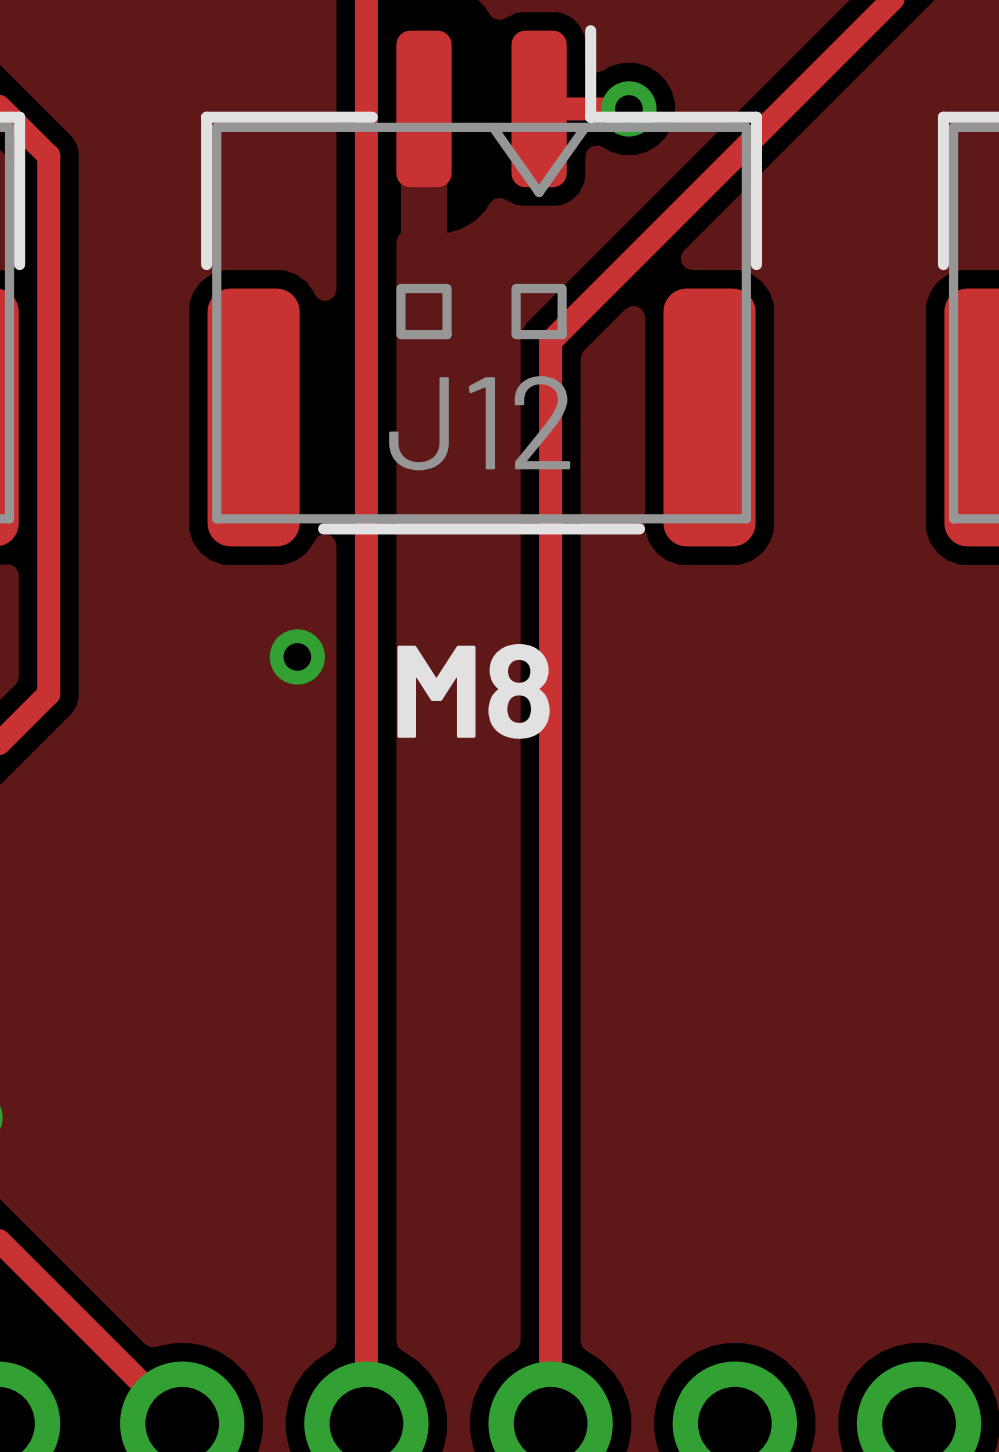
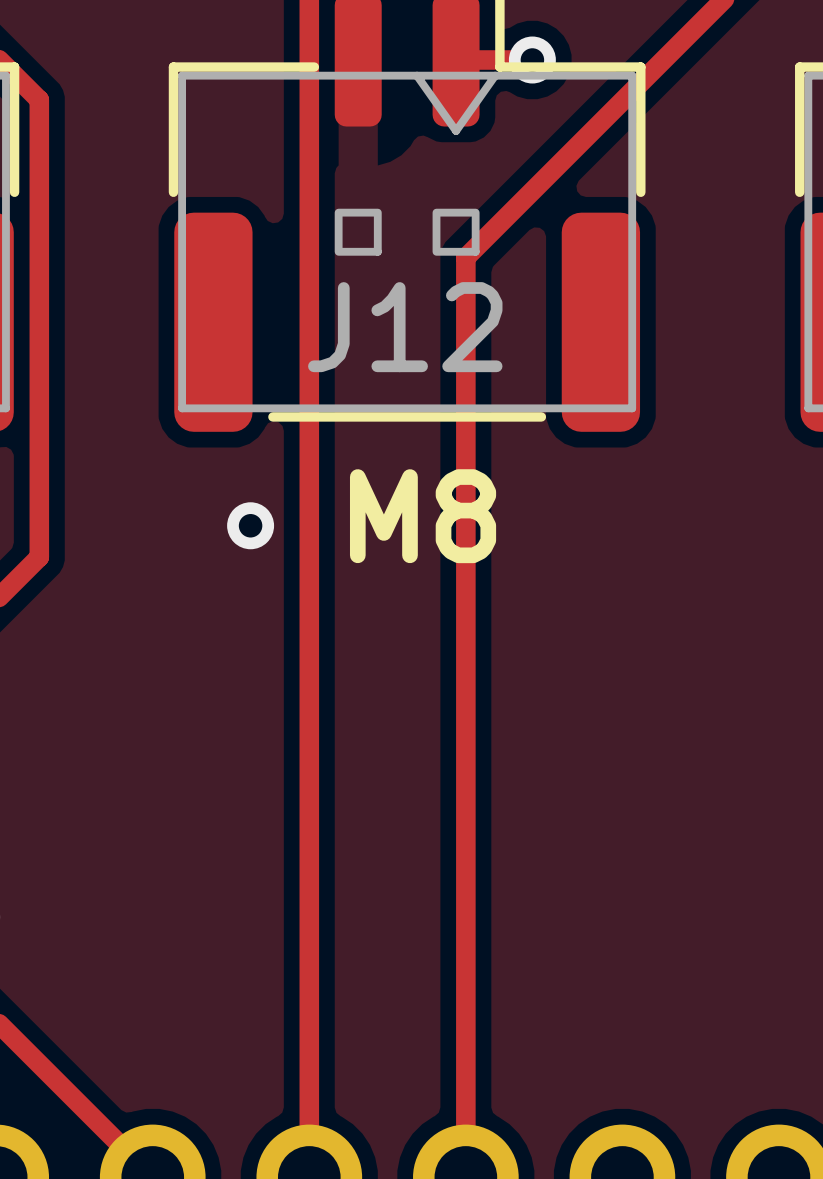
text position: M8 (473, 691) -> M8 (423, 516)

